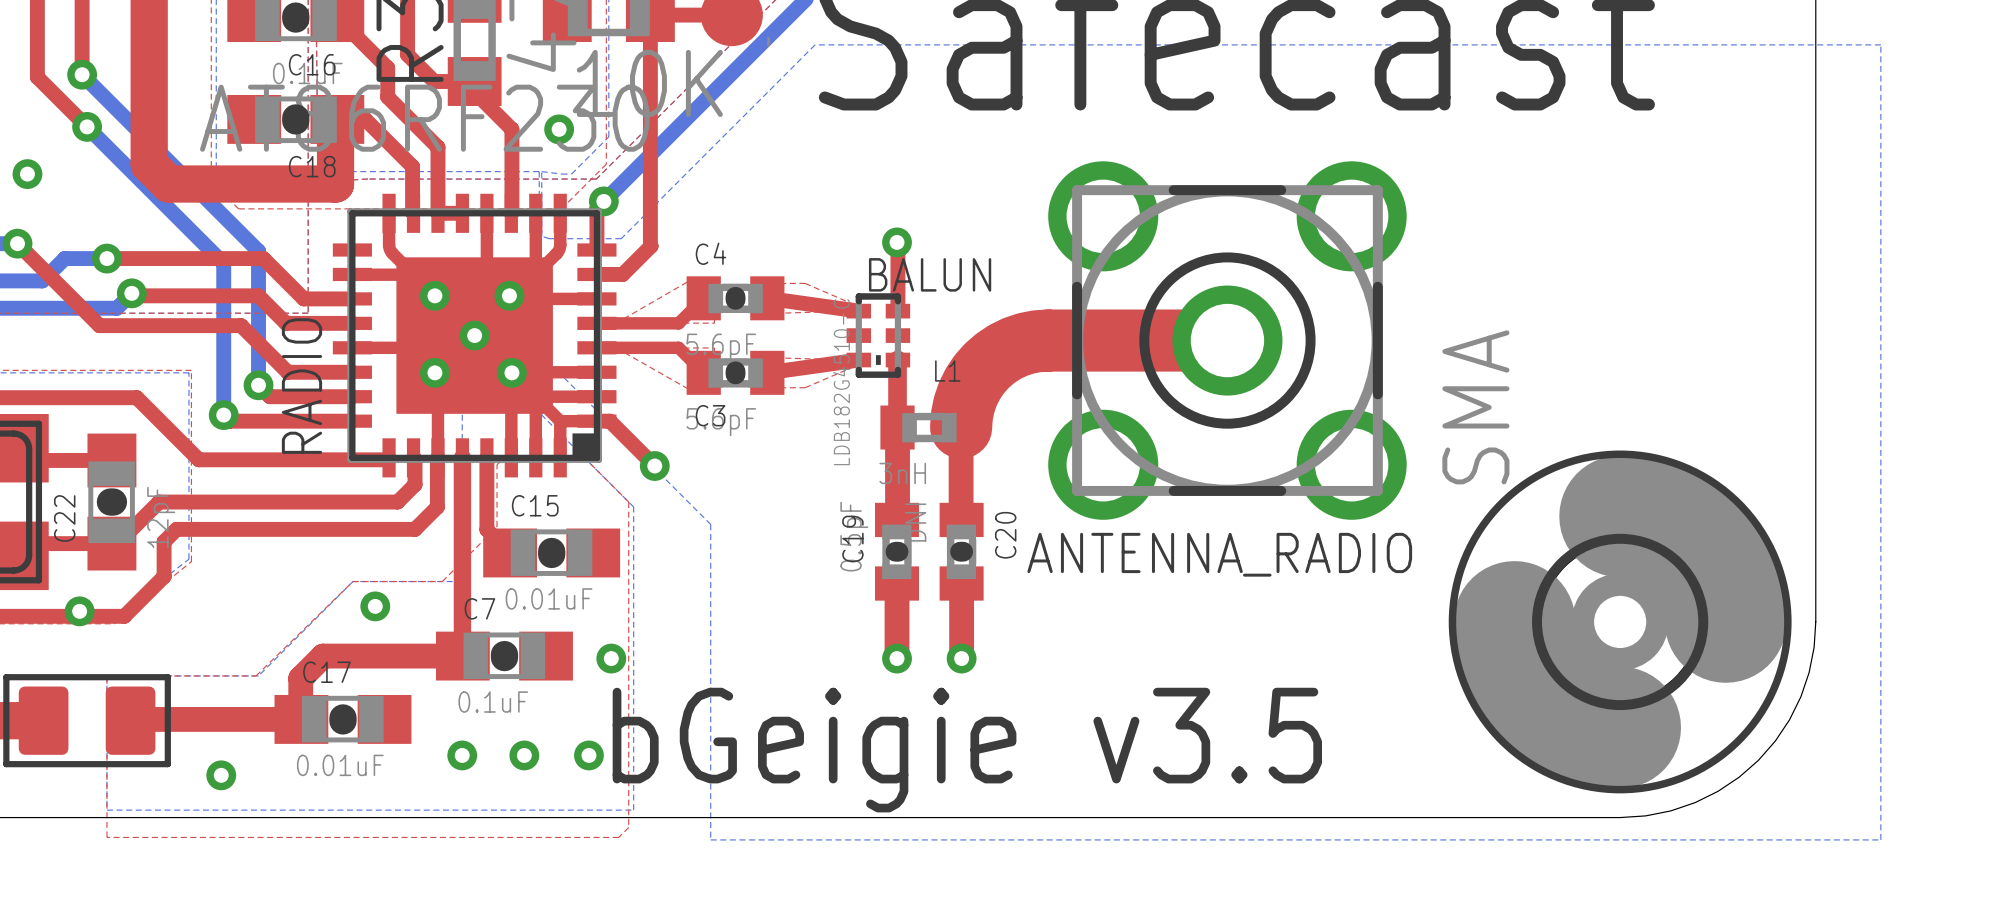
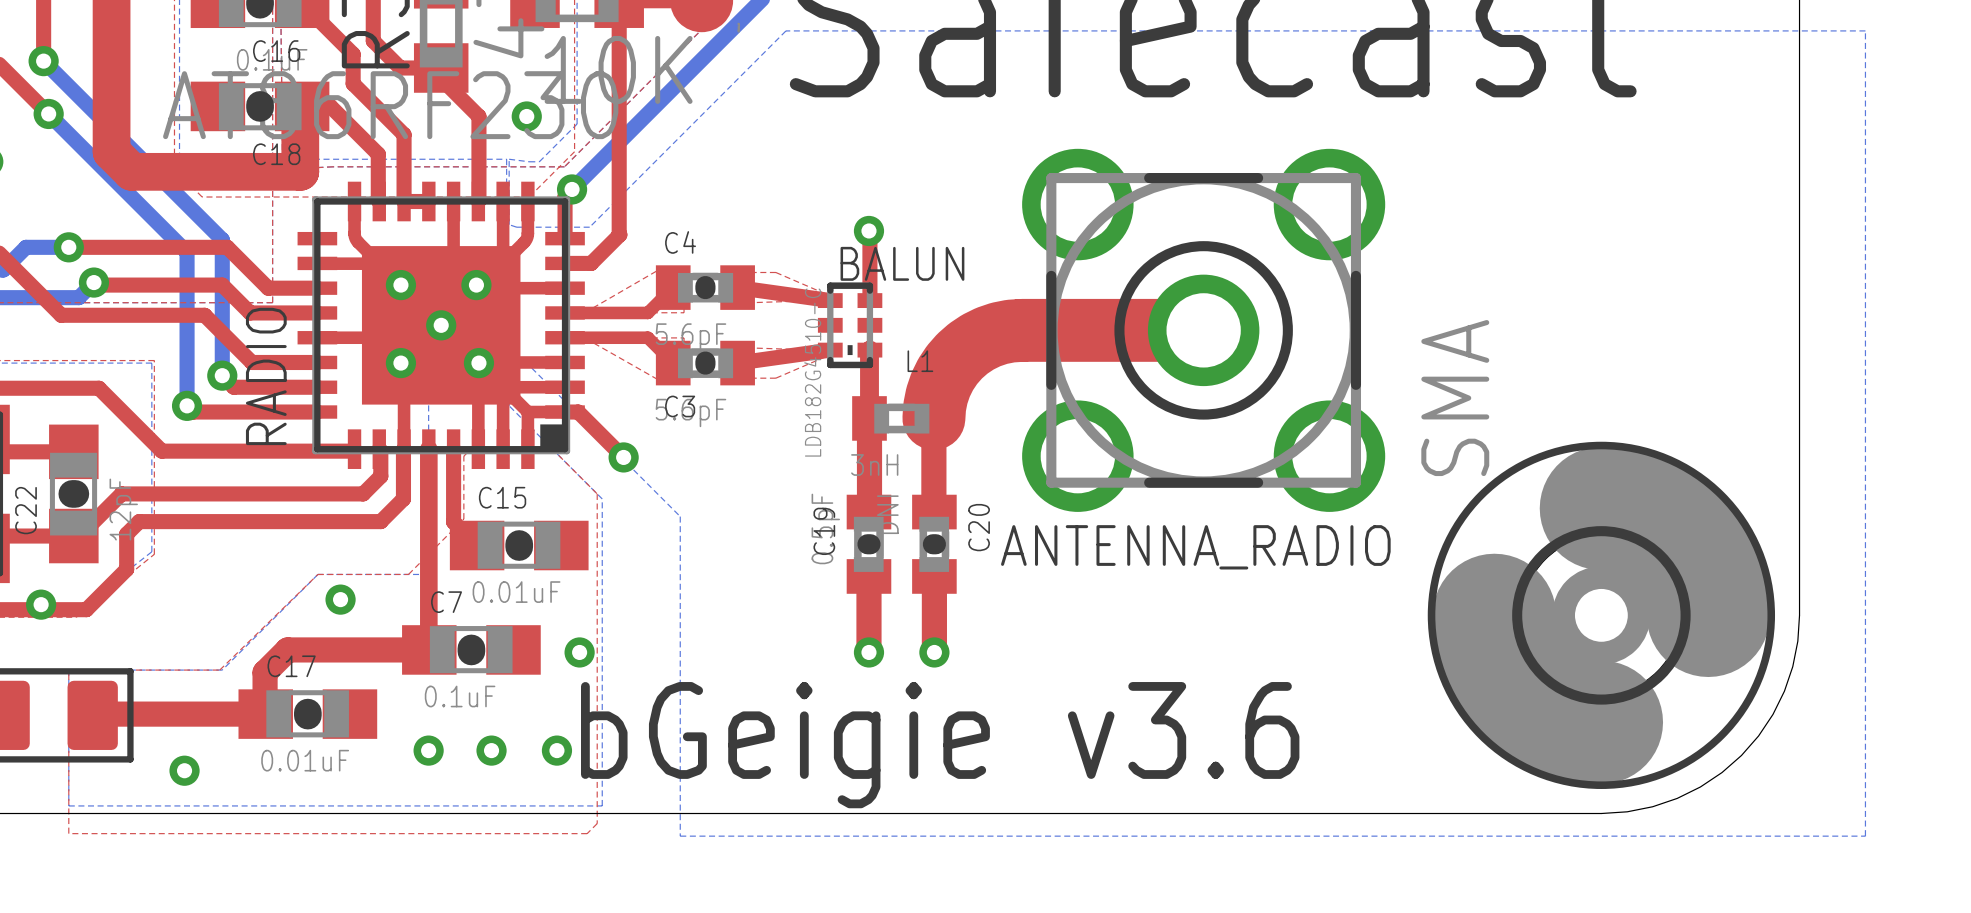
text: bGeigie v3.5 (967, 750) -> bGeigie v3.6 (940, 745)

